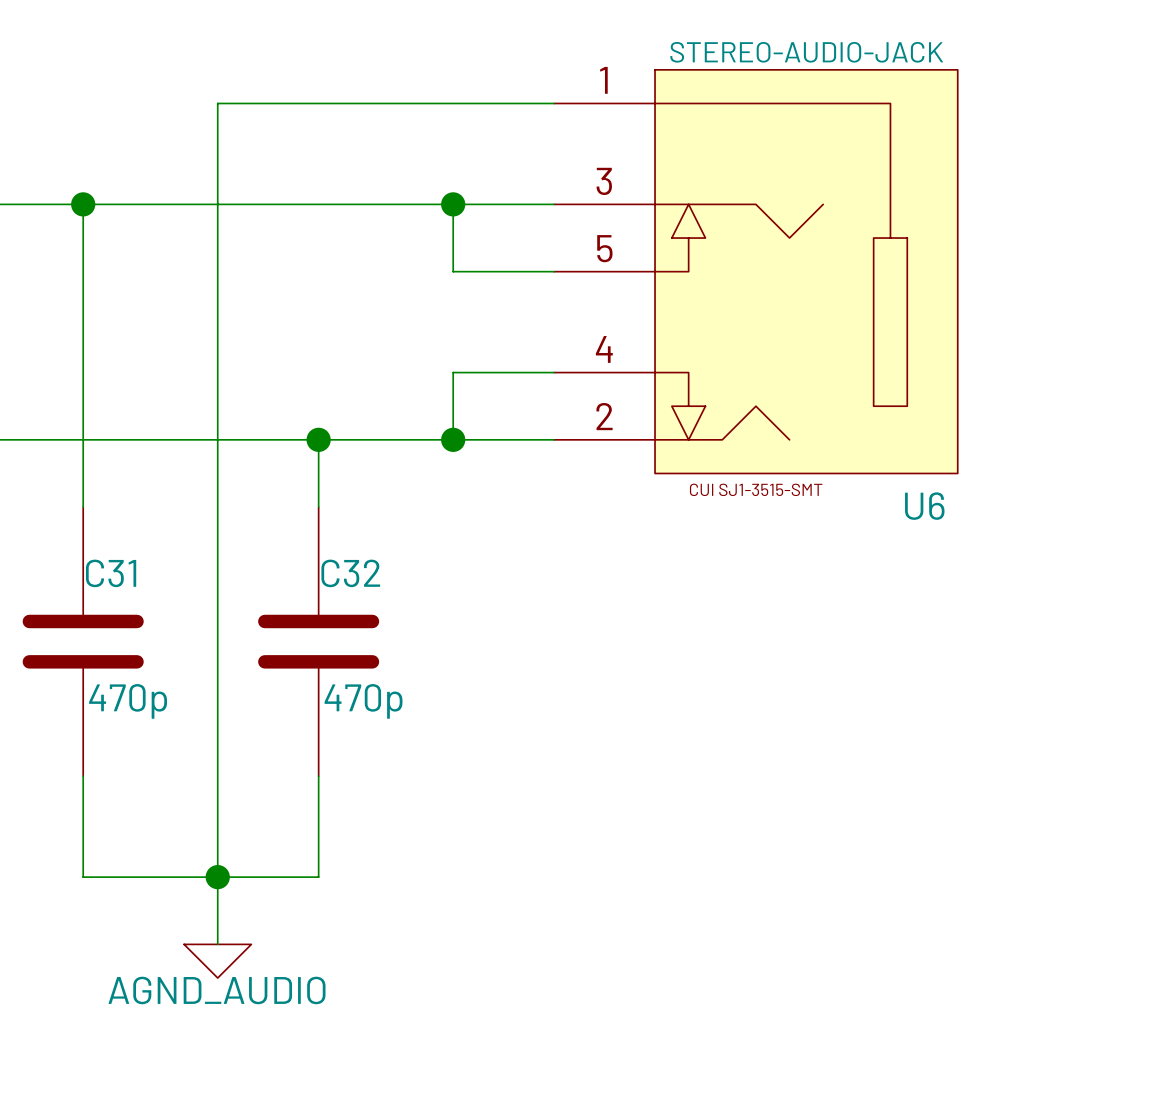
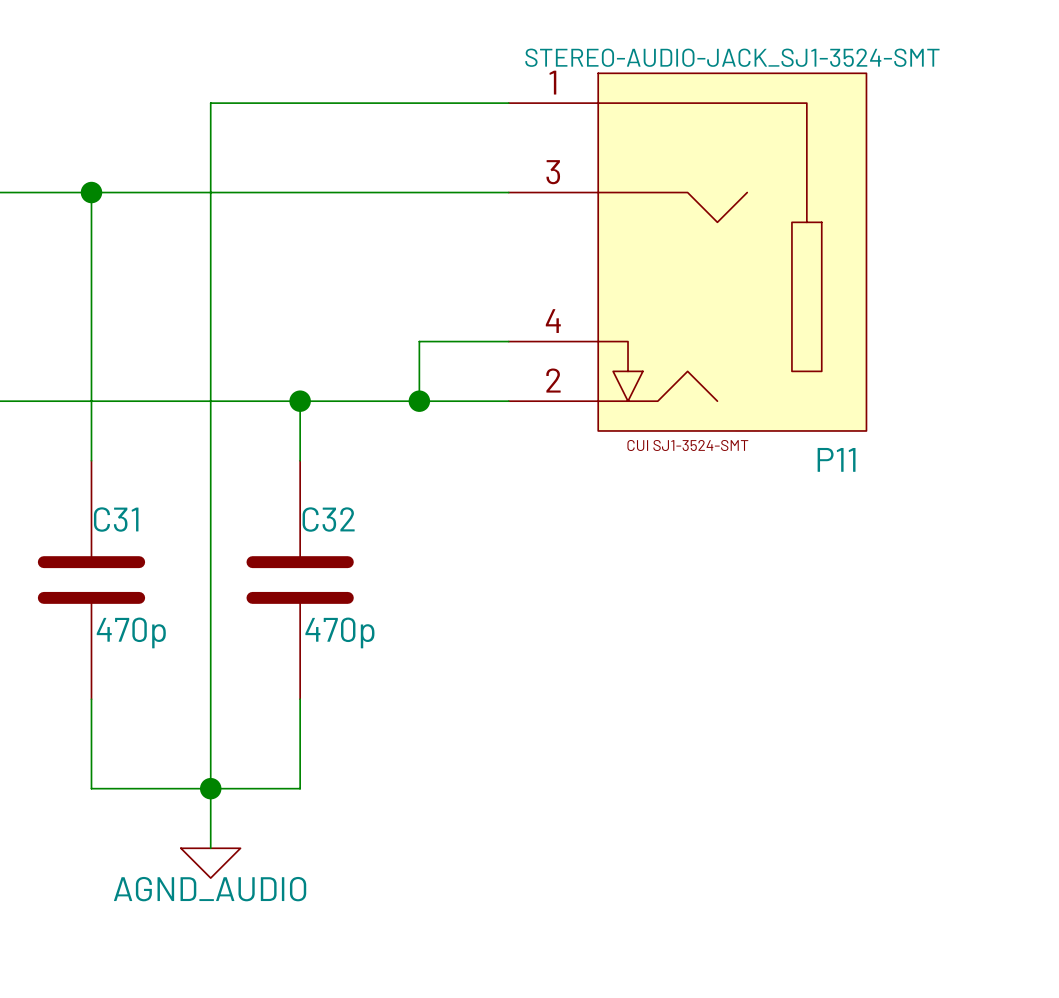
wire: (453, 204) (453, 271) (554, 271) -> none
junction: (453, 204) -> none
U6: STEREO-AUDIO-JACK (756, 271) -> none
P11: none -> STEREO-AUDIO-JACK_SJ1-3524-SMT (687, 252)

